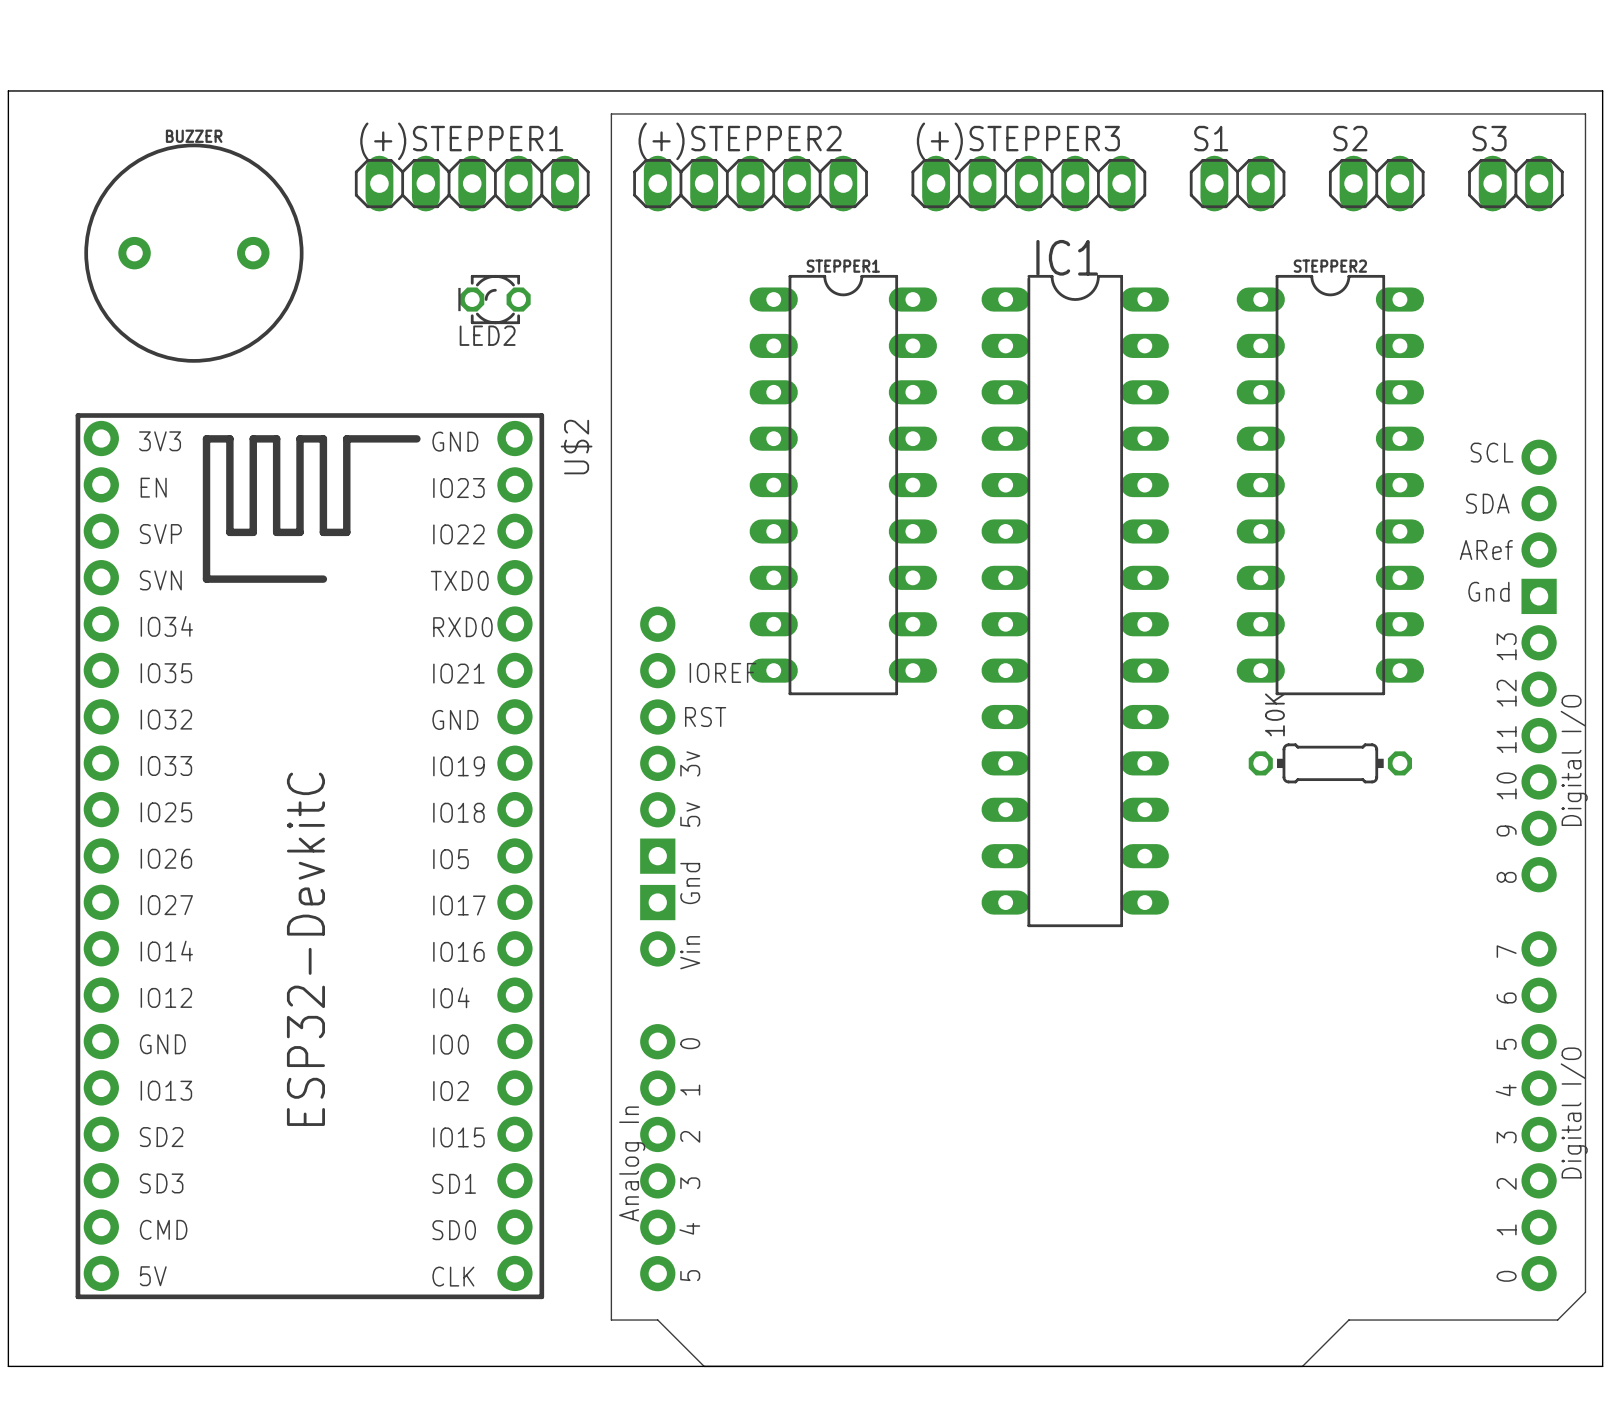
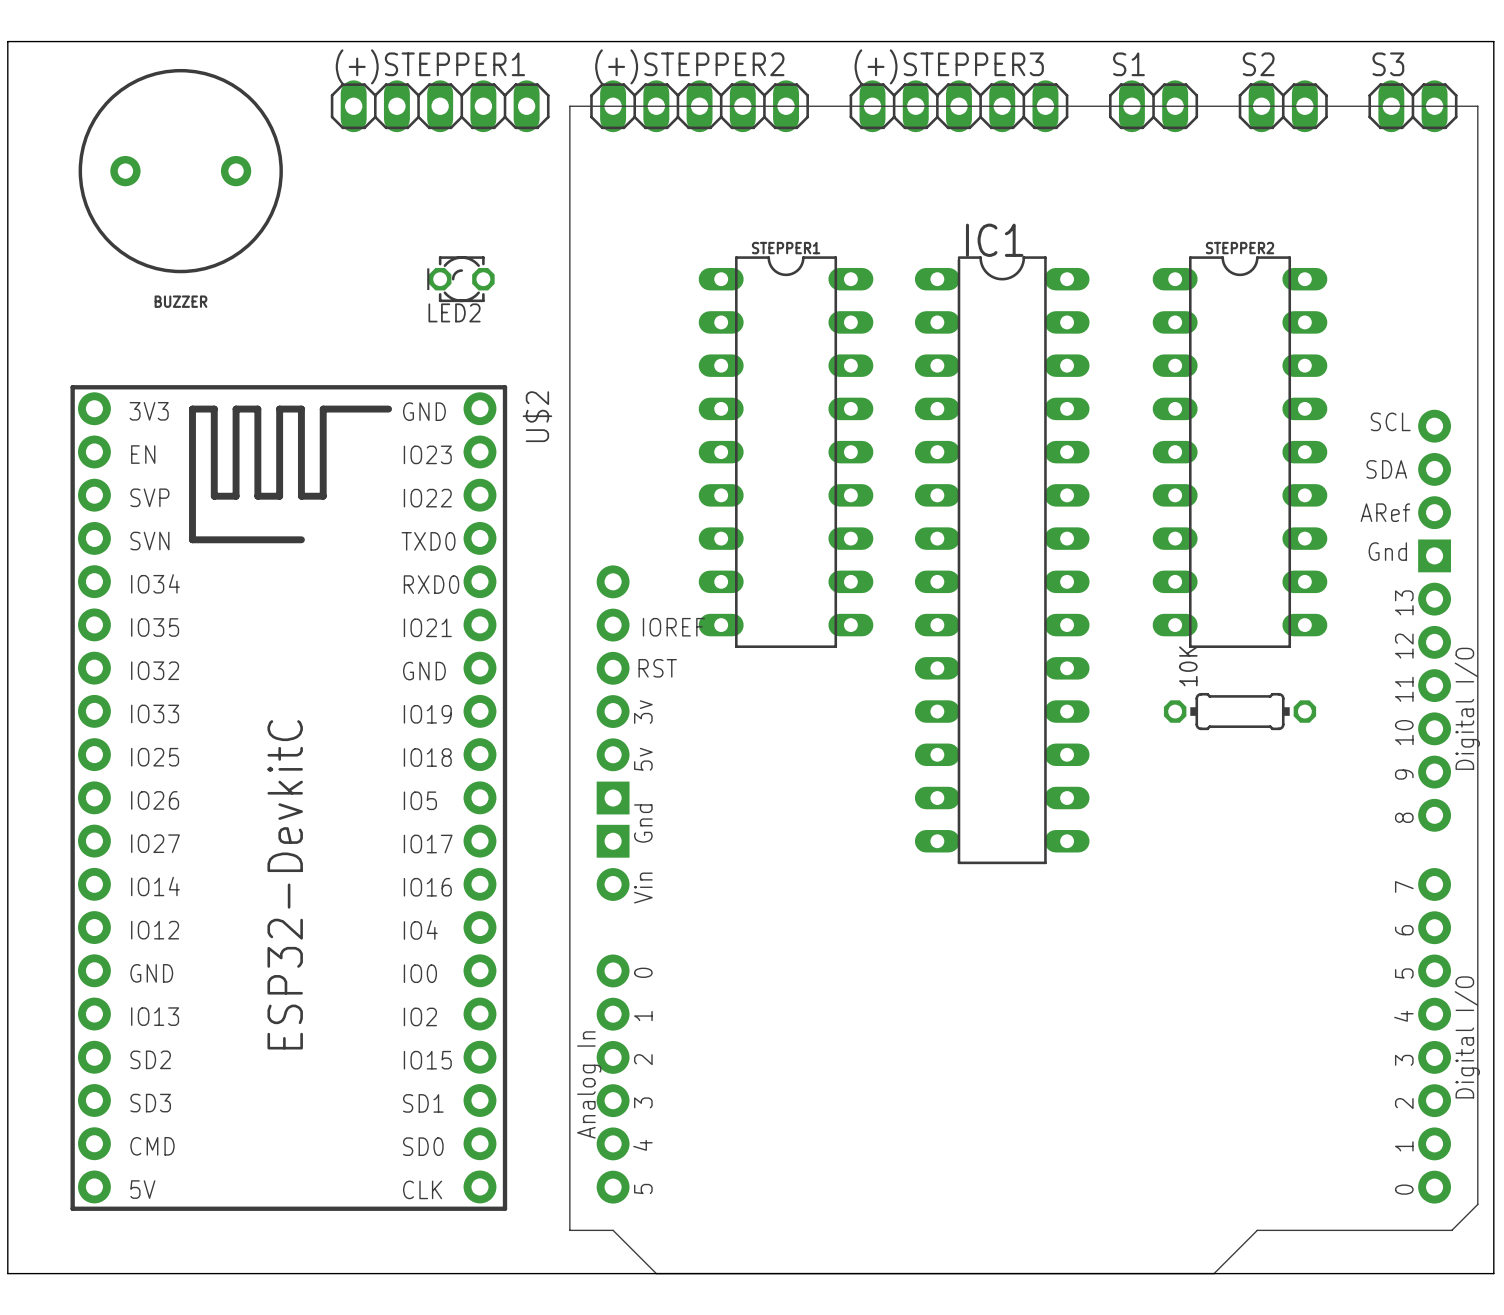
board edge: (8, 90) (1602, 90) -> (7, 84) (7, 41) (1493, 41) (1493, 84)
BUZZER name position: BUZZER (194, 136) -> BUZZER (180, 301)
(+)STEPPER1 position: (472, 183) -> (440, 106)
(+)STEPPER2 position: (750, 183) -> (699, 106)
(+)STEPPER3 position: (1028, 183) -> (958, 106)
S1 position: (1237, 183) -> (1153, 106)
S2 position: (1376, 183) -> (1283, 106)
S3 position: (1515, 183) -> (1412, 106)
BUZZER position: (193, 253) -> (180, 171)

